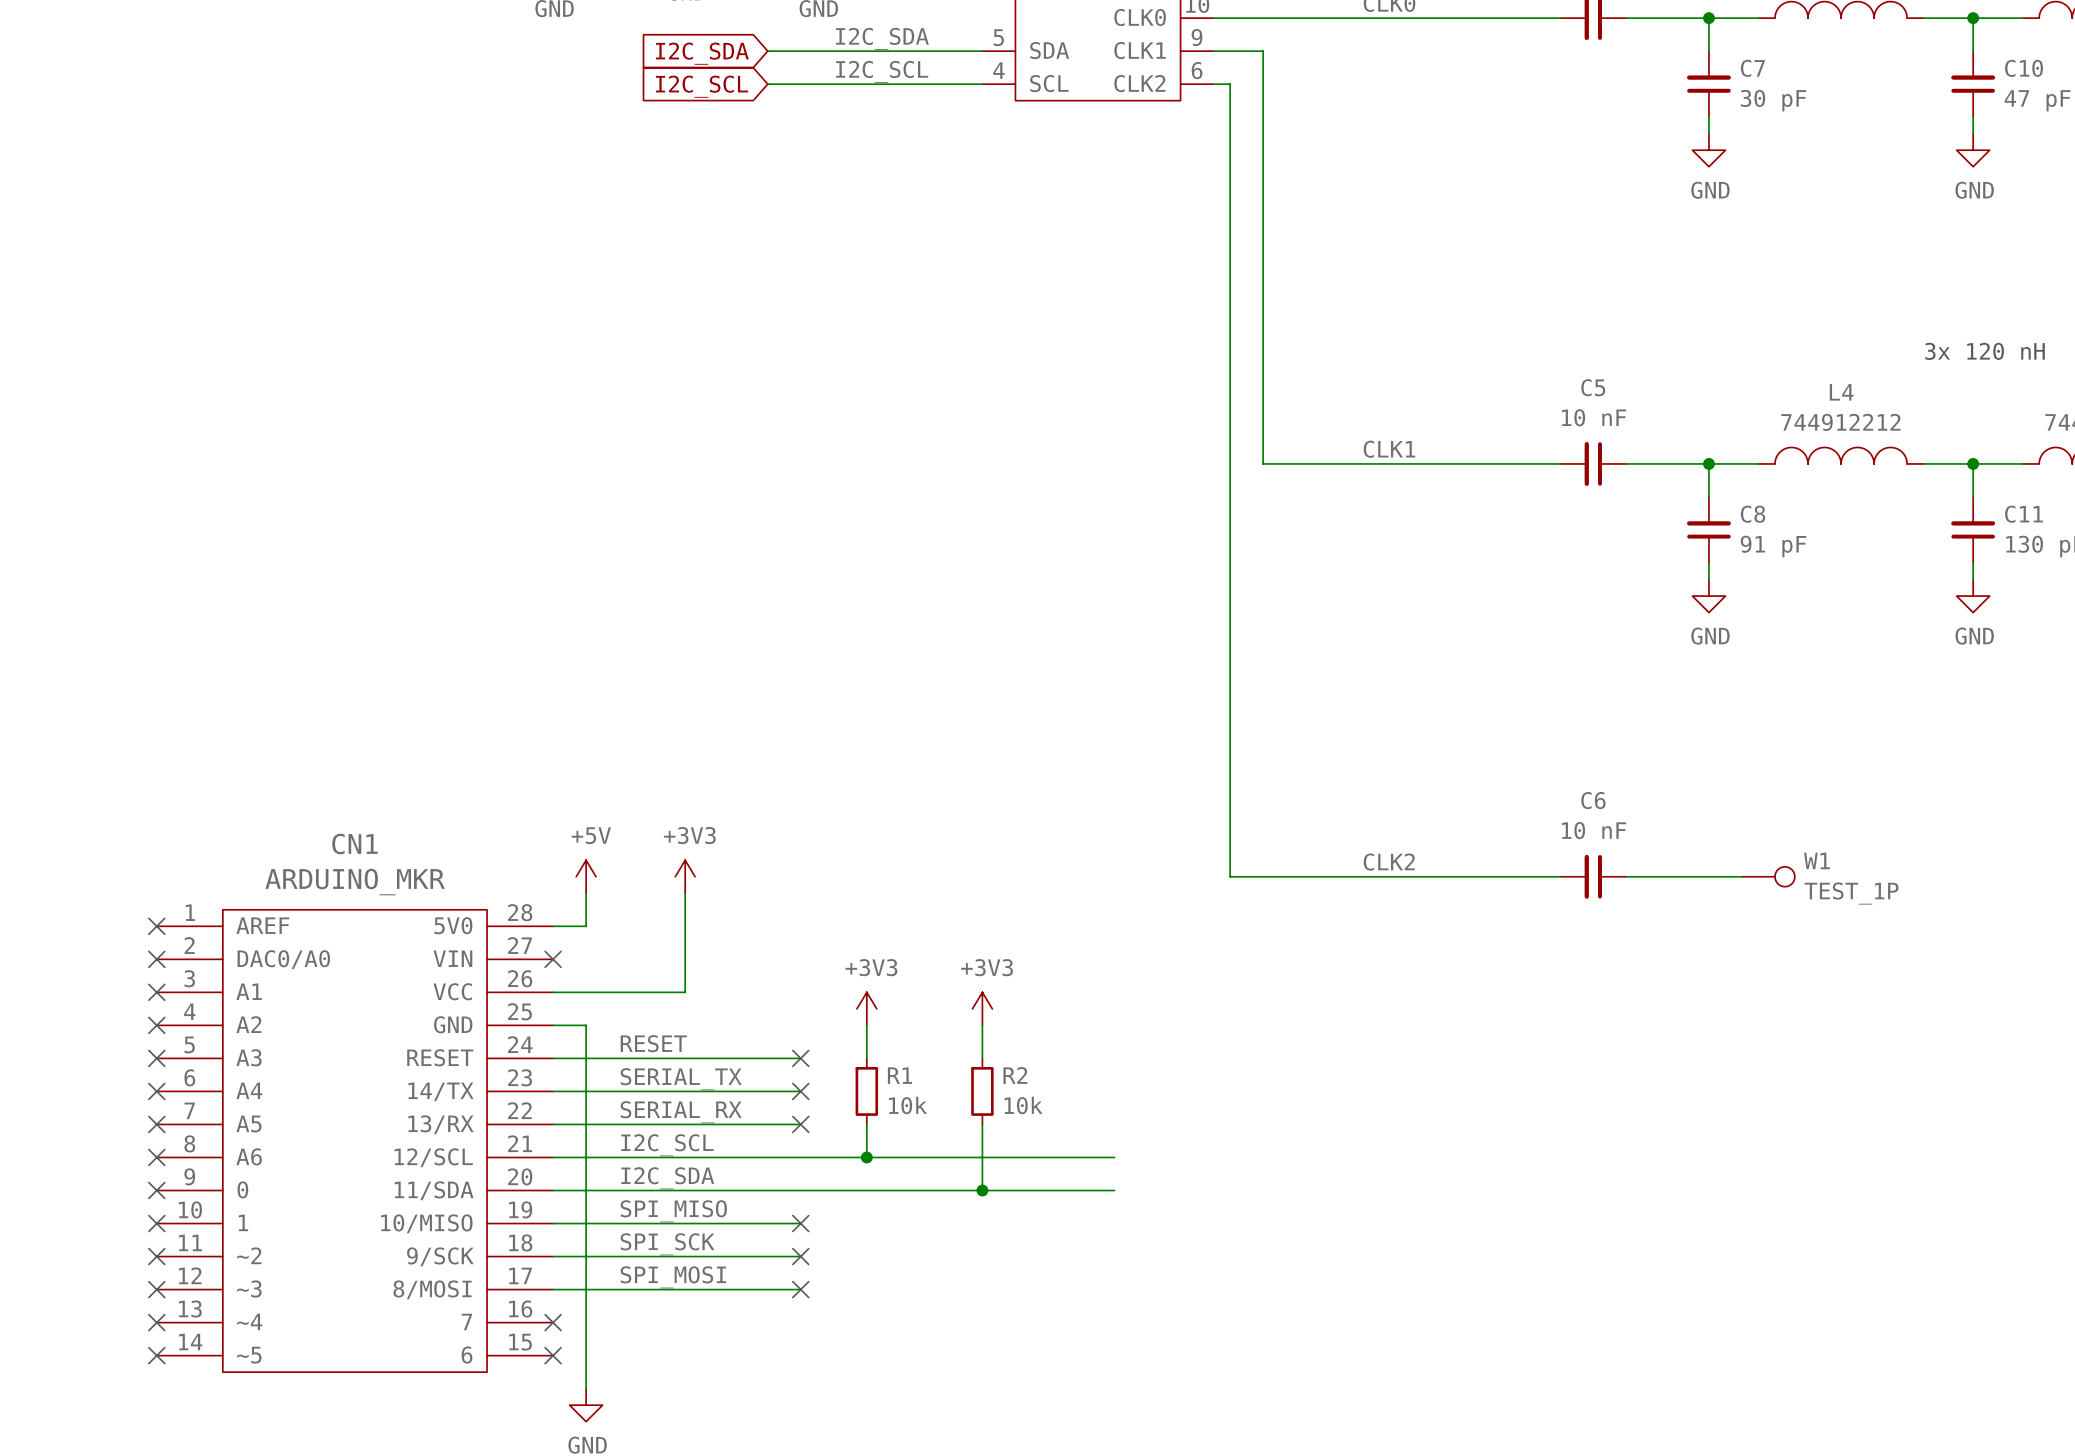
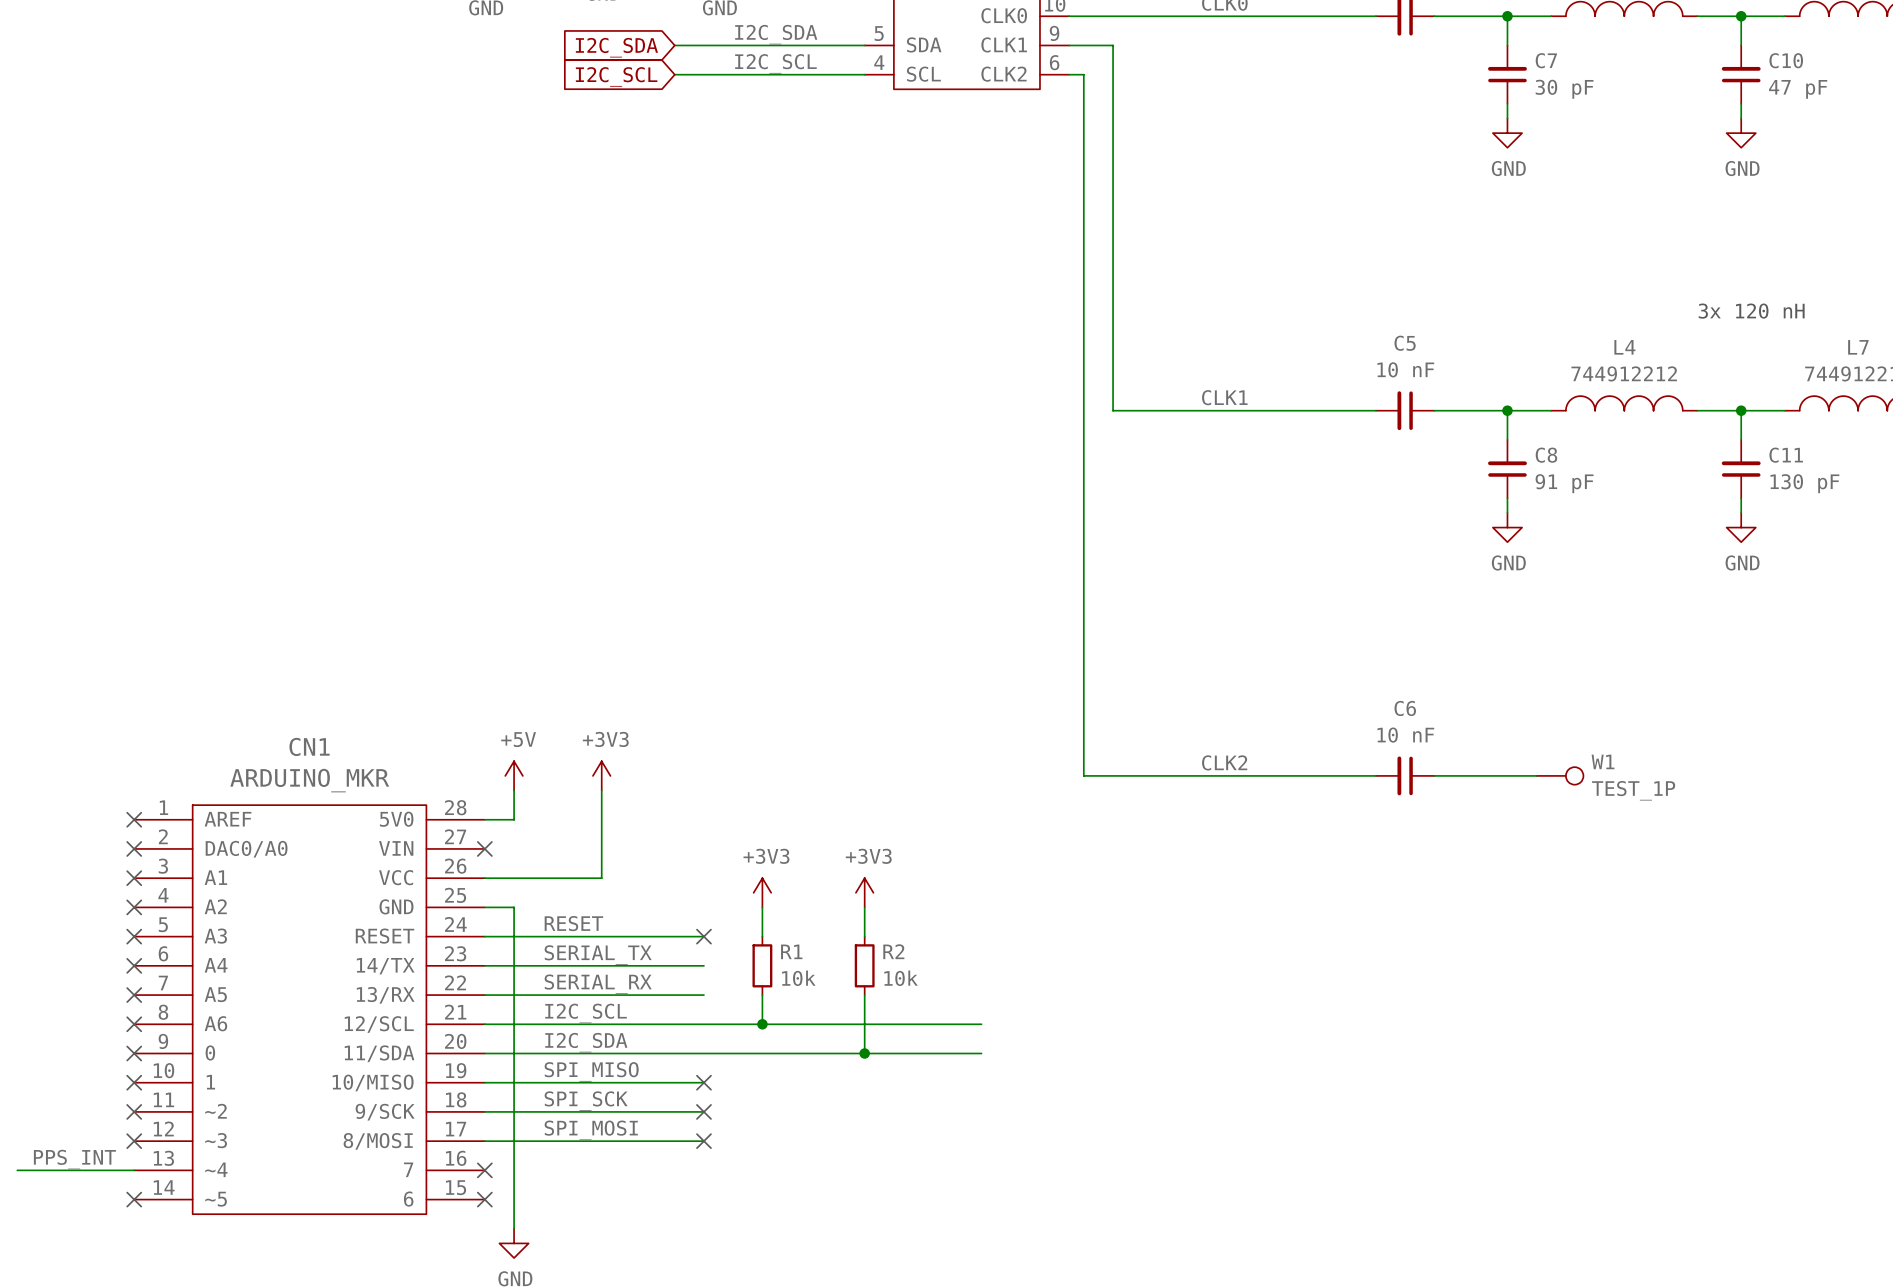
no-connect mark: (800, 1091) -> none
no-connect mark: (800, 1124) -> none
label: none -> PPS_INT (74, 1159)
wire: none -> (17, 1170) (134, 1170)
no-connect mark: (156, 1322) -> none

